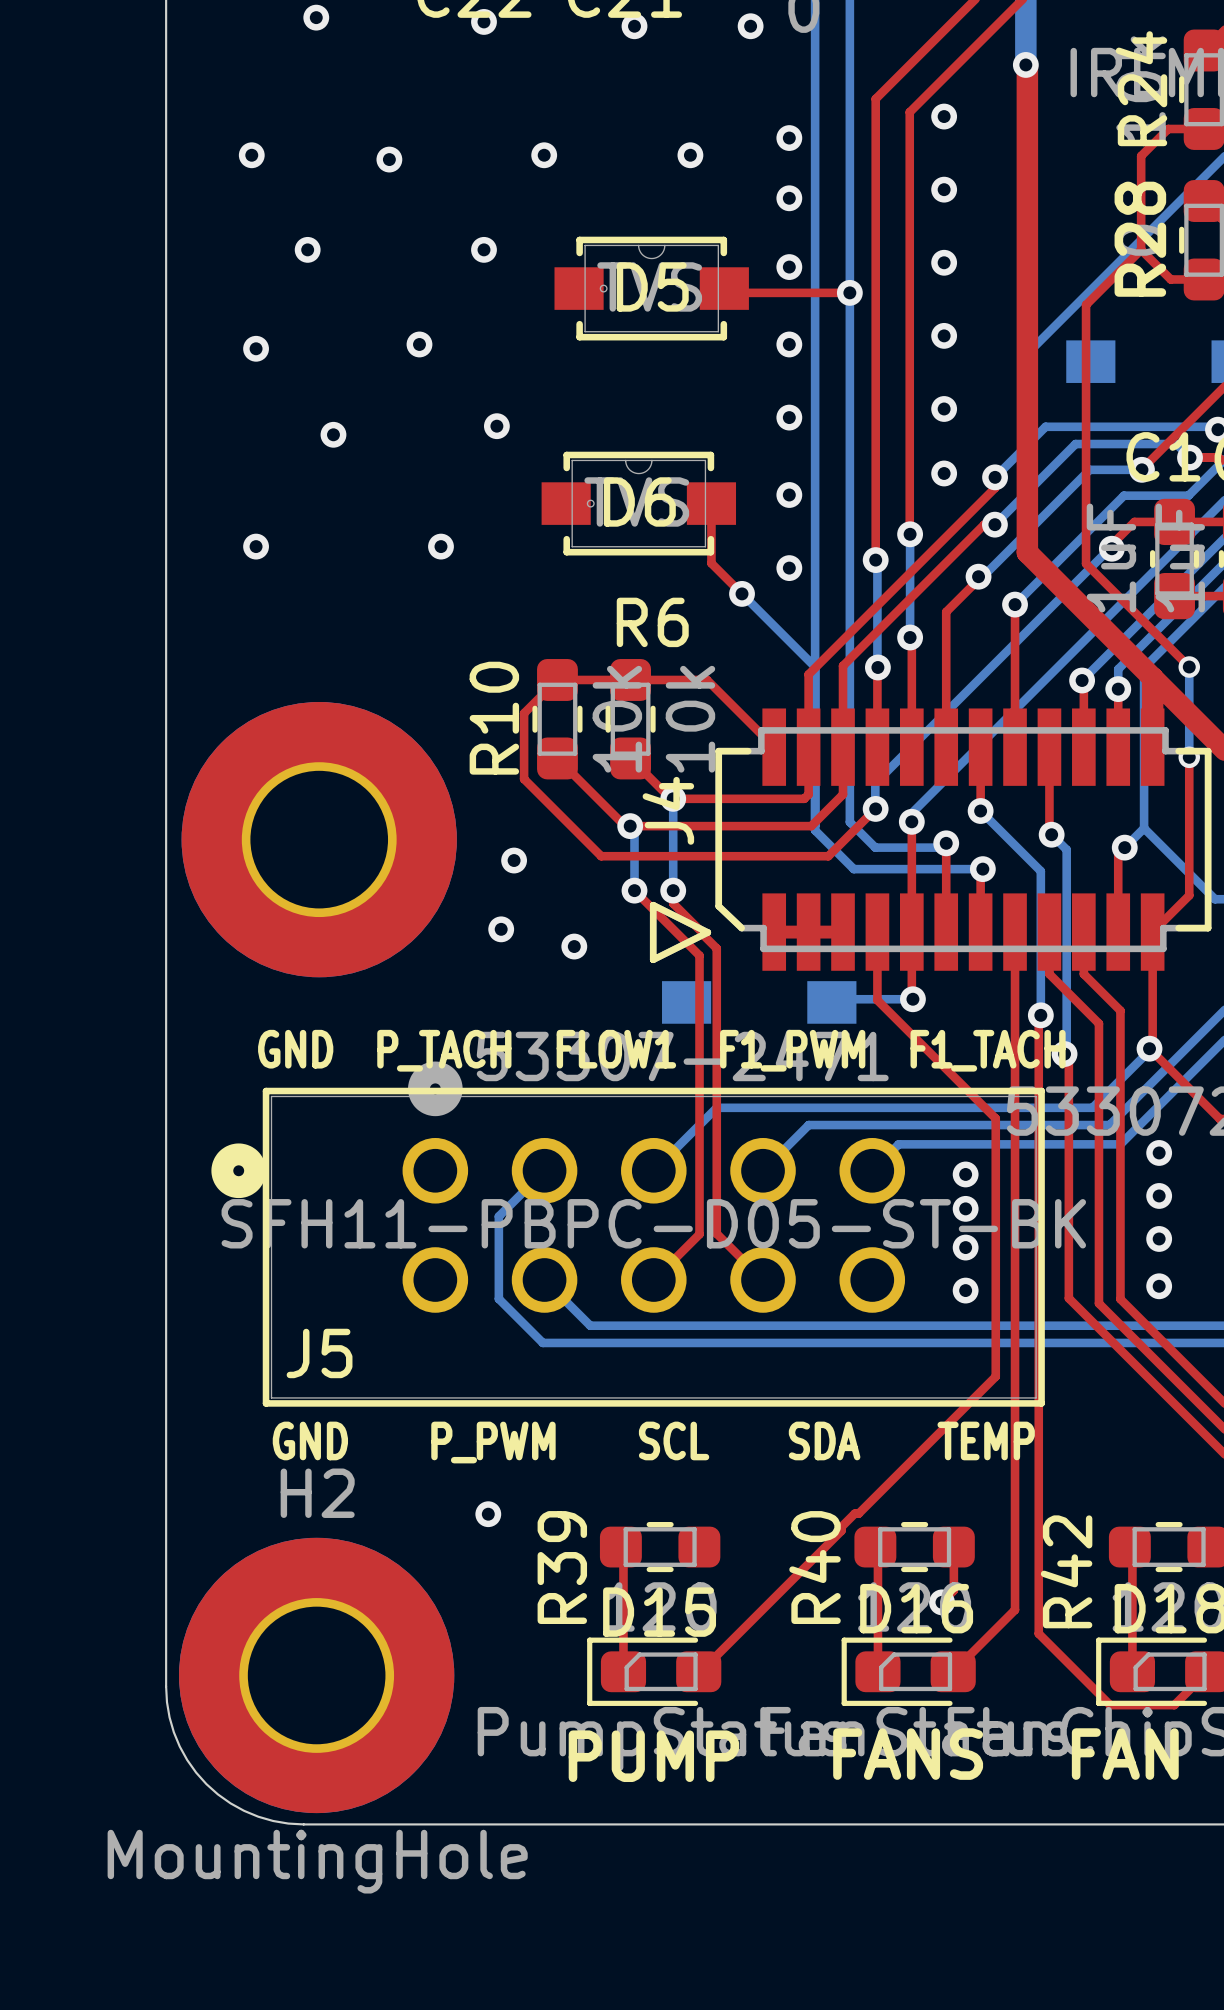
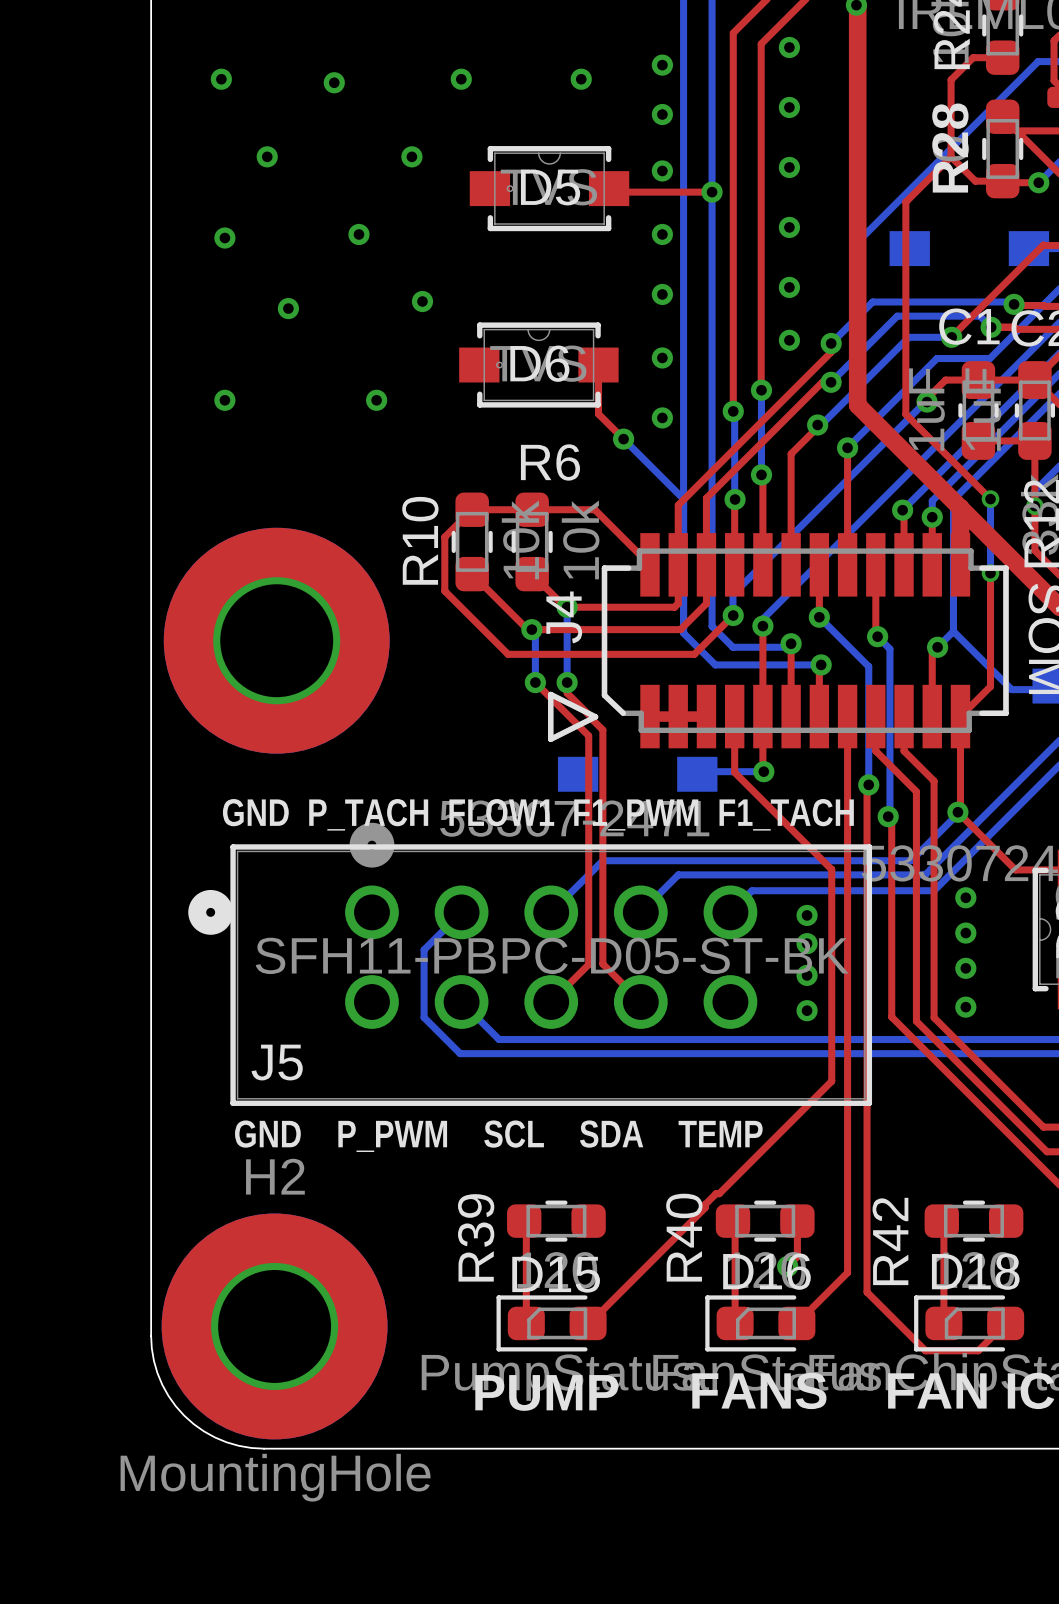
via: (514, 860) -> none
via: (501, 929) -> none
via: (574, 946) -> none
via: (488, 1514) -> none

